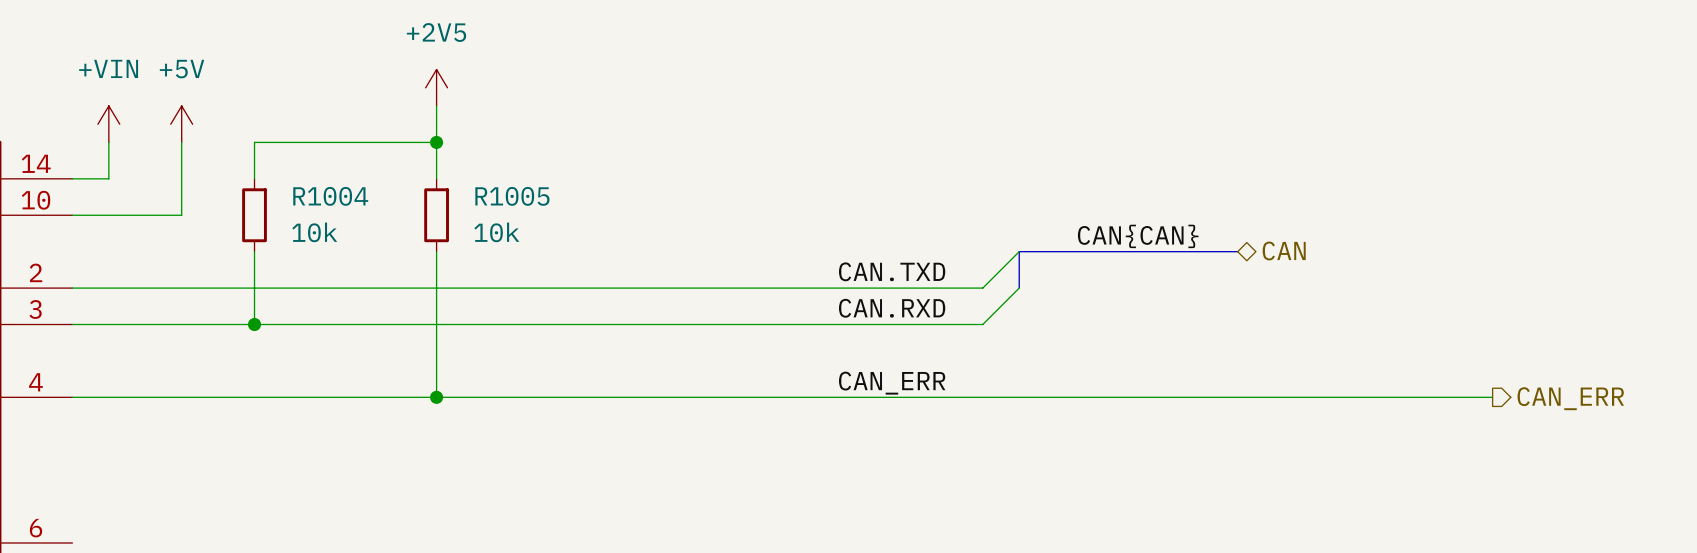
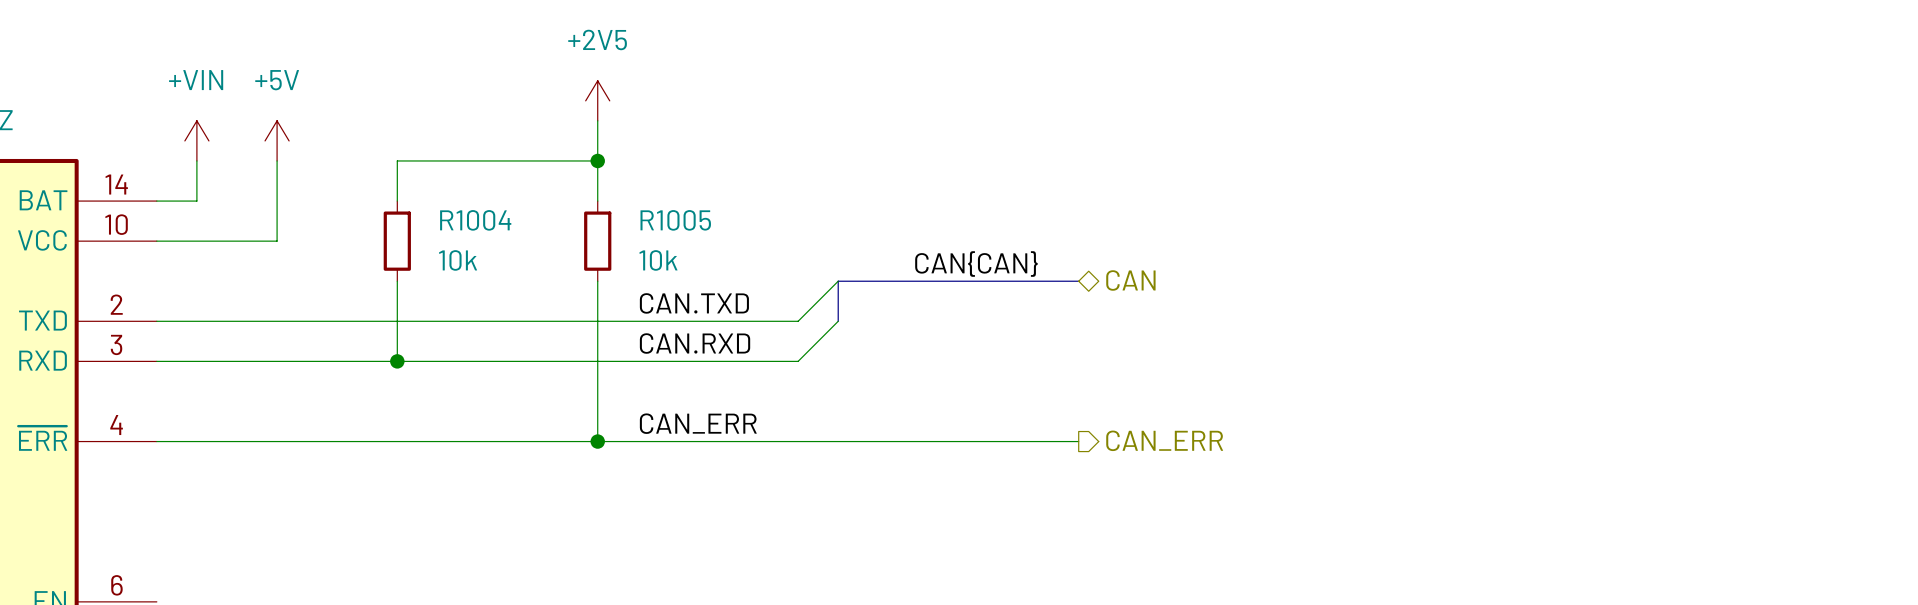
power symbol position: +2V5 (436, 87) -> +2V5 (597, 100)
wire: (436, 106) (436, 178) -> (597, 120) (597, 201)
wire: (290, 142) (254, 142) (254, 178) -> (397, 160) (397, 201)
wire: none -> (557, 160) (597, 160)
junction position: (436, 142) -> (597, 160)
R1004 position: (254, 215) -> (397, 241)
R1005 position: (436, 215) -> (597, 241)
label position: CAN{CAN} (1138, 236) -> CAN{CAN} (976, 264)
hierarchical label position: CAN (1284, 250) -> CAN (1130, 280)
wire: (254, 251) (254, 324) -> (397, 281) (397, 361)
wire: (436, 251) (436, 397) -> (597, 281) (597, 441)
wire: (1019, 251) (982, 288) (655, 288) -> (838, 281) (798, 321)
bus: (1237, 251) (1019, 251) (1019, 288) -> (1078, 281) (838, 281) (838, 321)
label position: CAN.TXD (892, 271) -> CAN.TXD (694, 303)
wire: (1019, 288) (982, 324) (655, 324) -> (838, 321) (798, 361)
label position: CAN.RXD (892, 308) -> CAN.RXD (695, 343)
junction position: (254, 324) -> (397, 361)
label position: CAN_ERR (892, 383) -> CAN_ERR (698, 423)
junction position: (436, 397) -> (597, 441)
wire: (909, 397) (1492, 397) -> none
hierarchical label: none -> CAN_ERR (1164, 440)
hierarchical label: CAN_ERR (1570, 398) -> none

